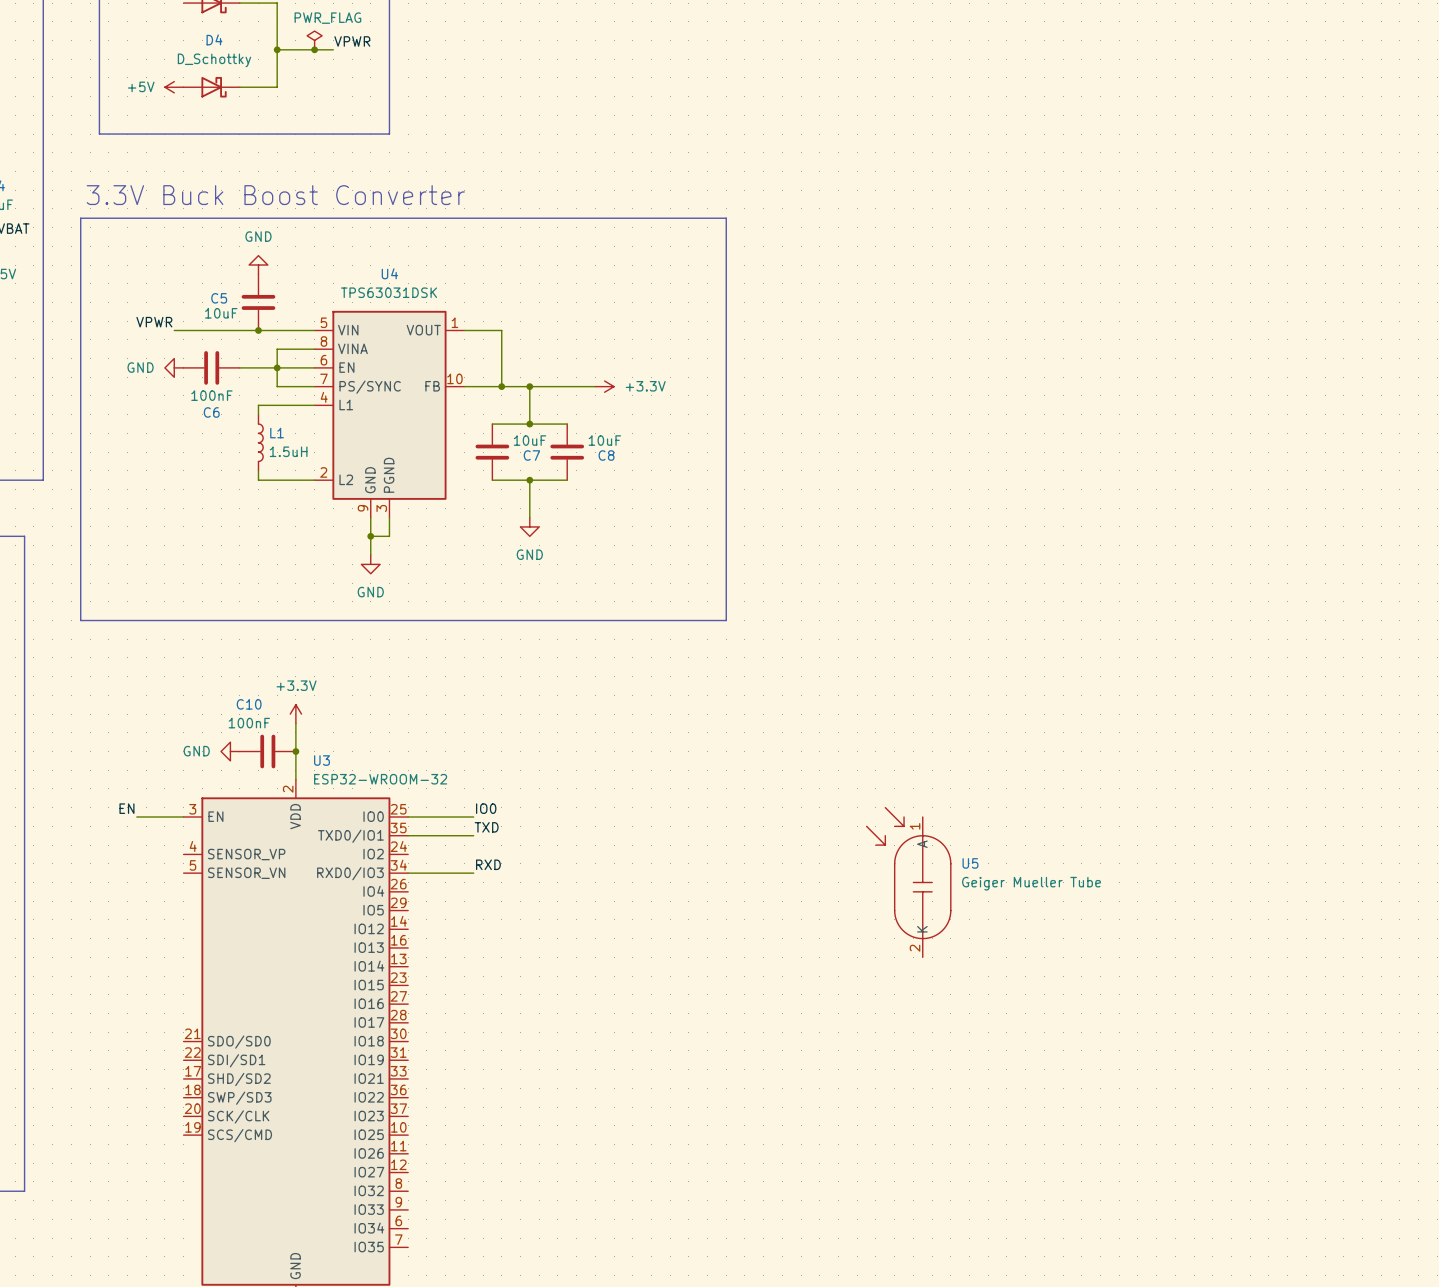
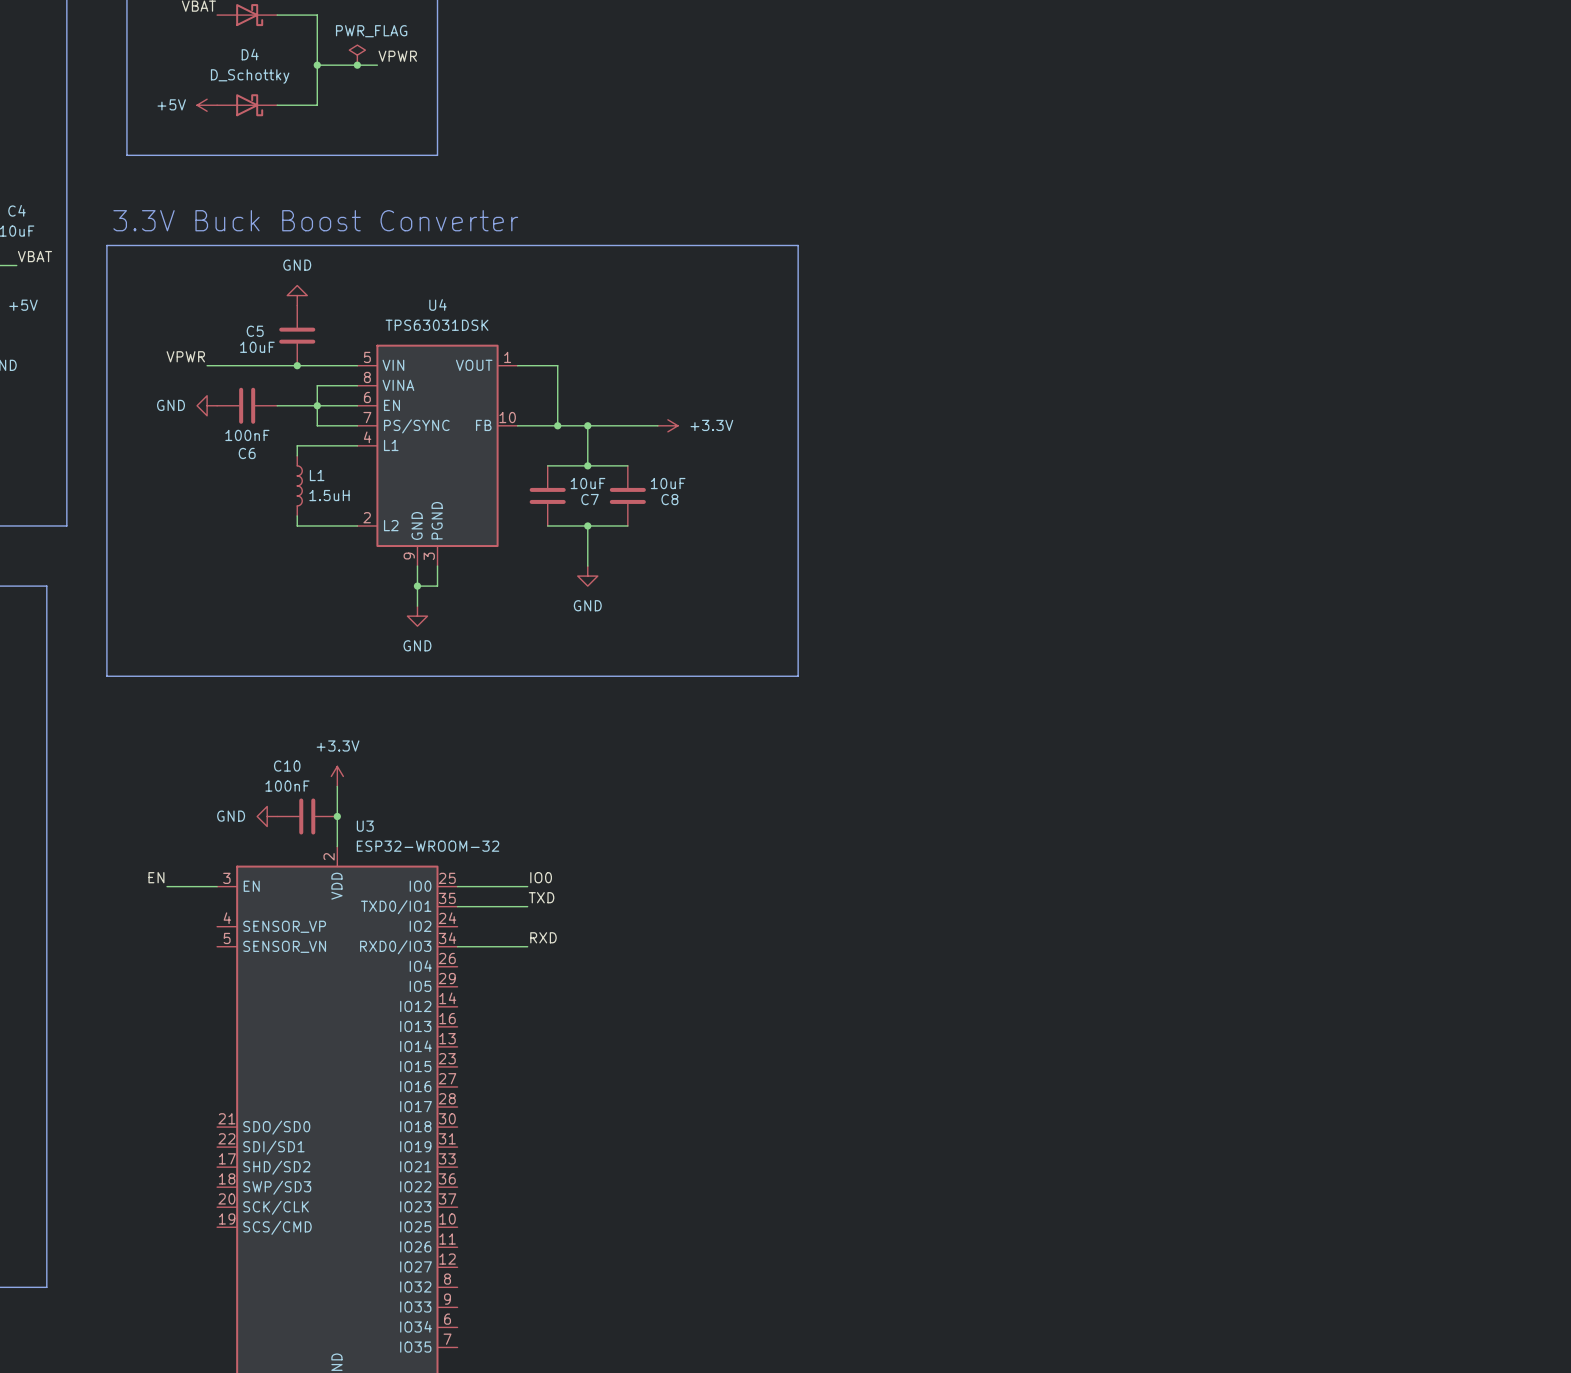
U5: Geiger Mueller Tube (908, 882) -> none

